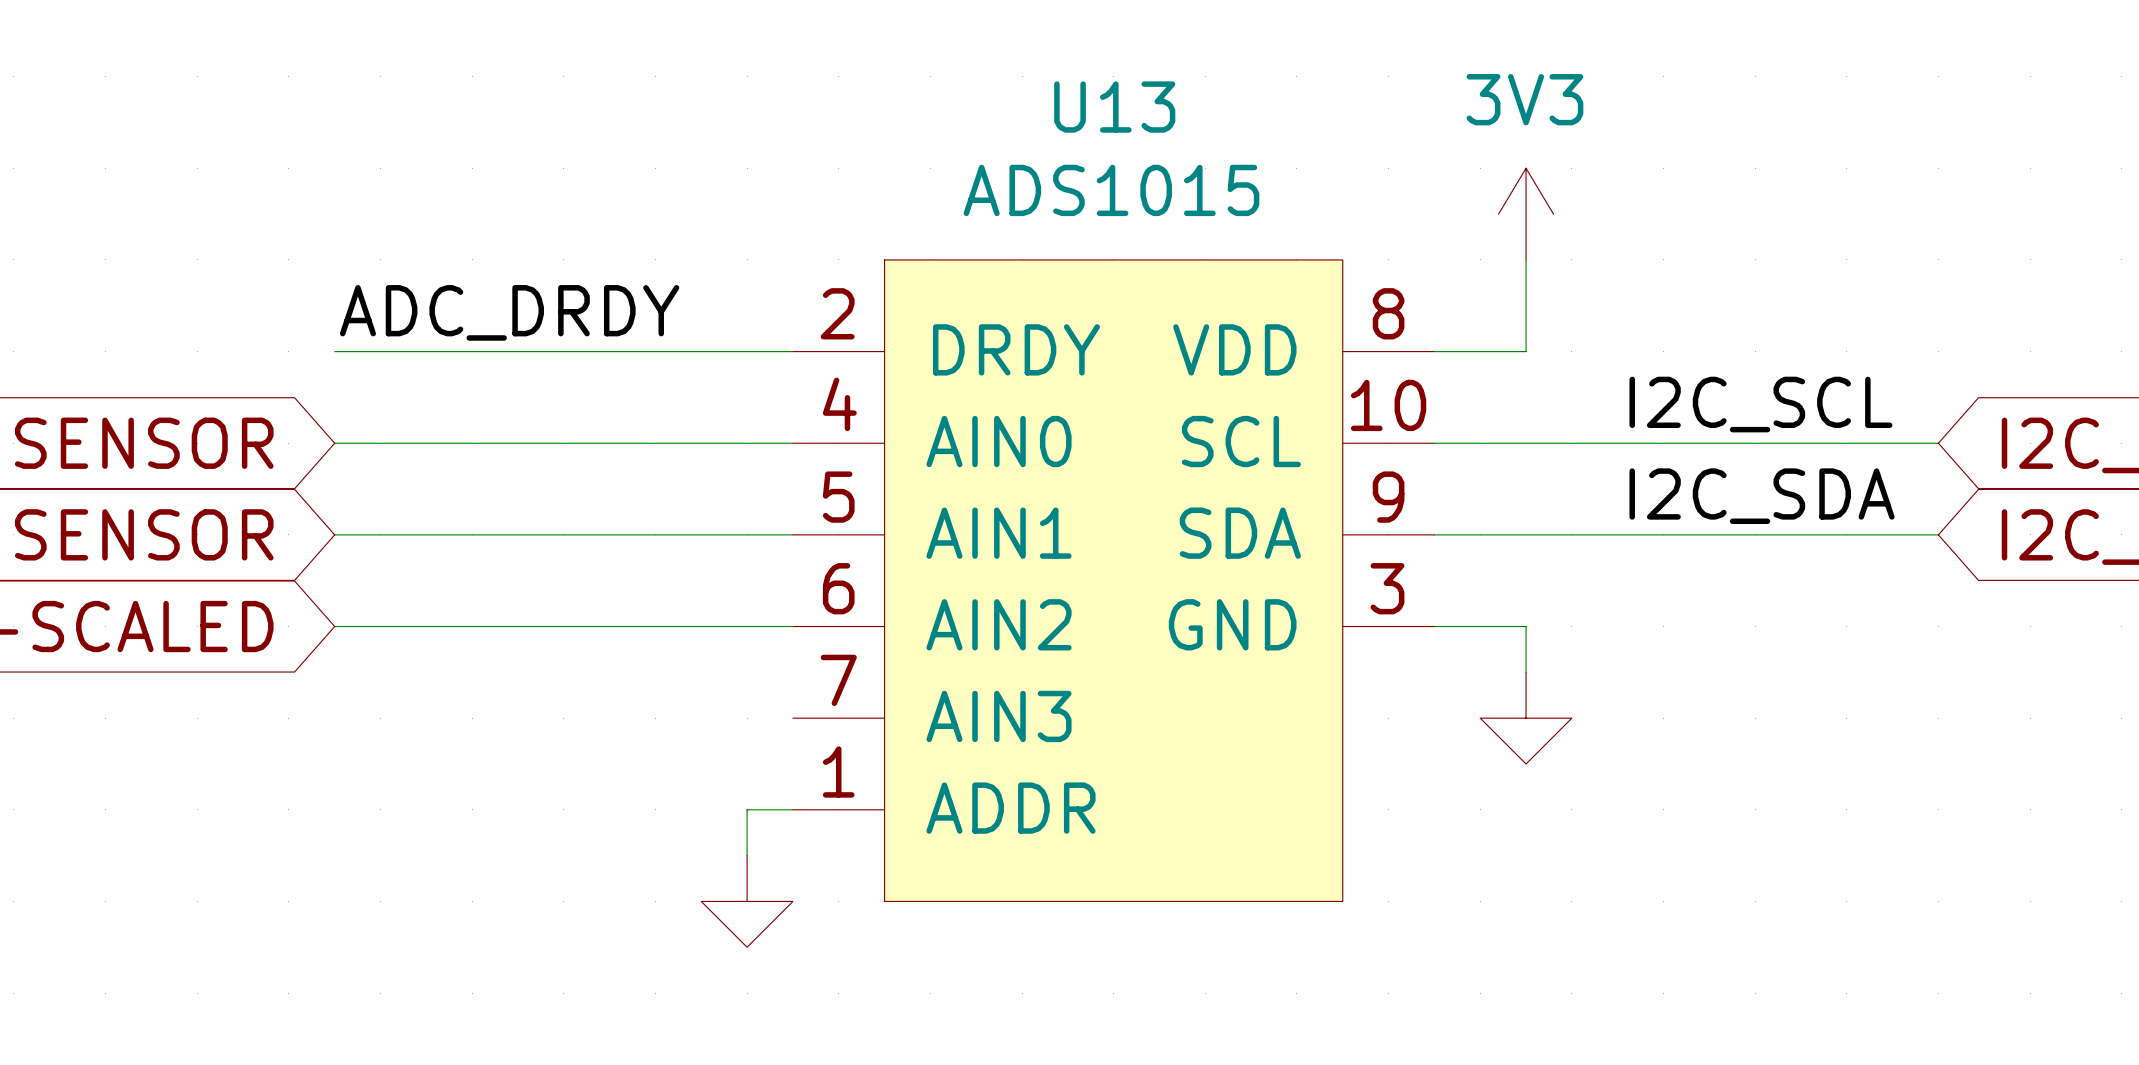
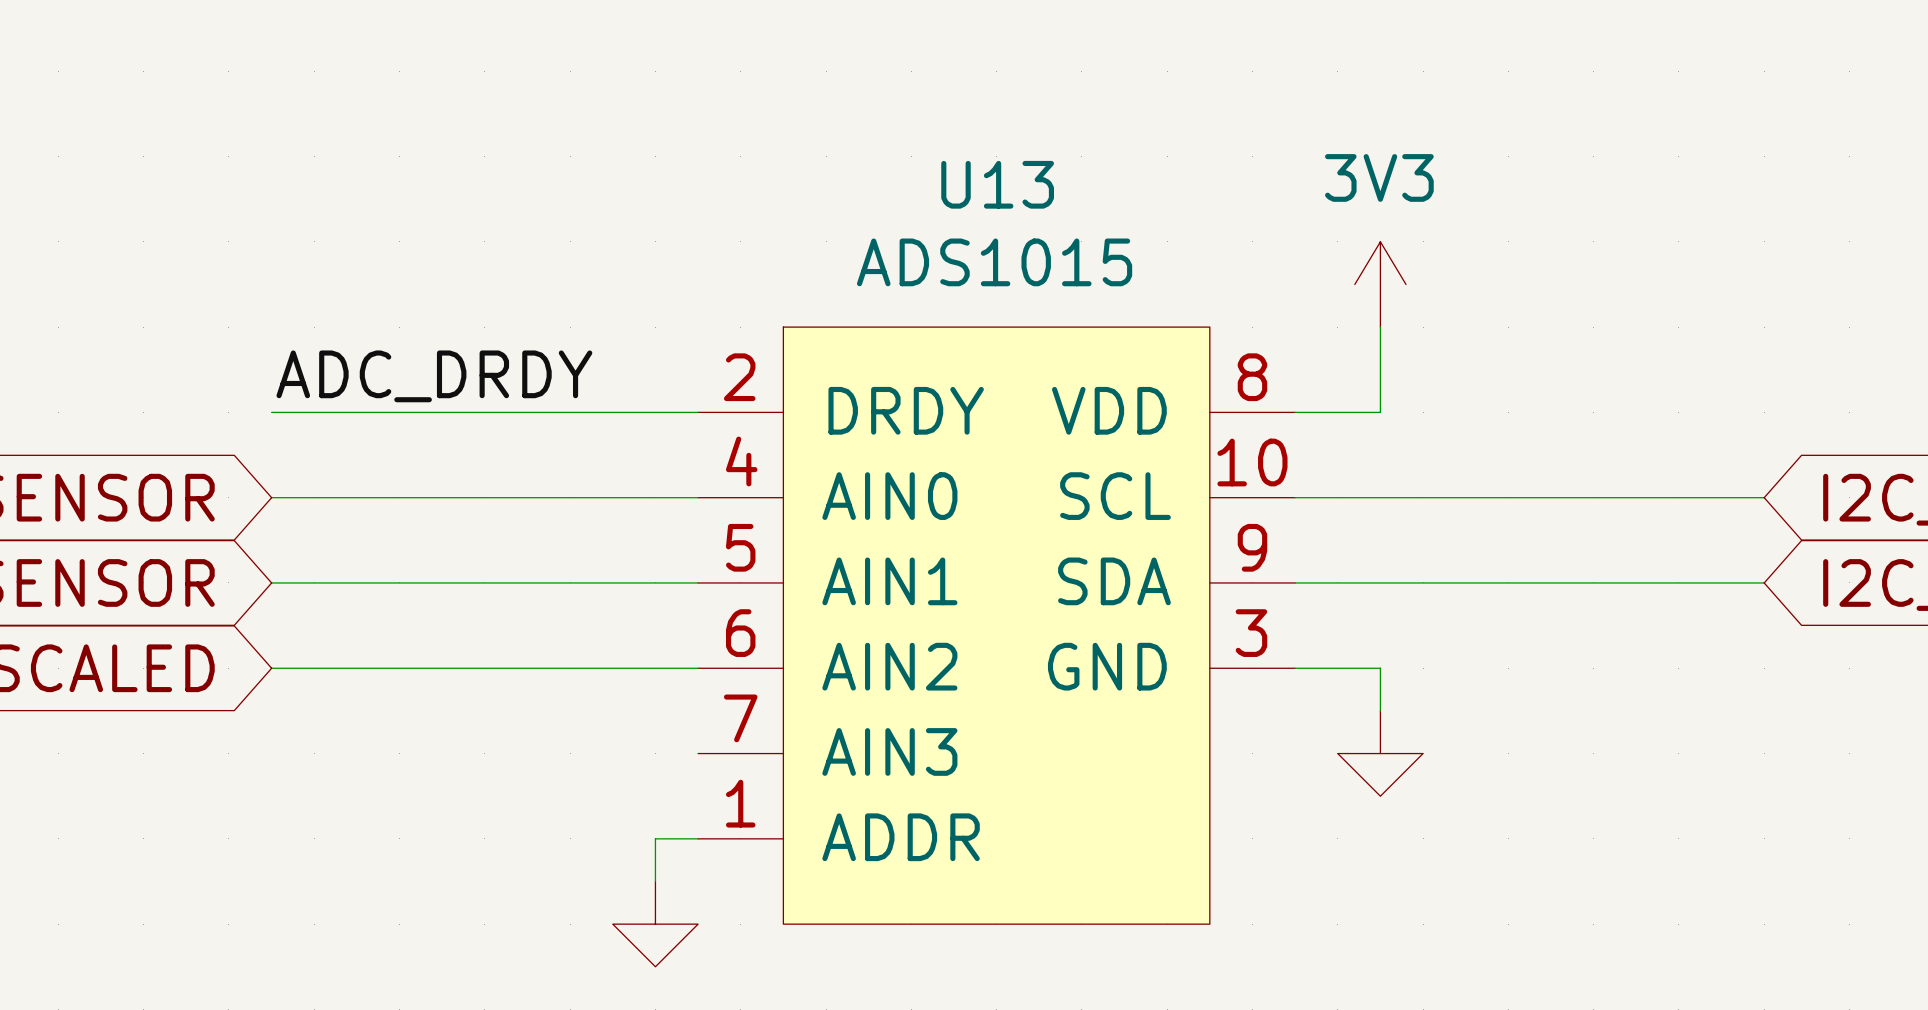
label: I2C_SCL (1760, 404) -> none
label: I2C_SDA (1762, 496) -> none

